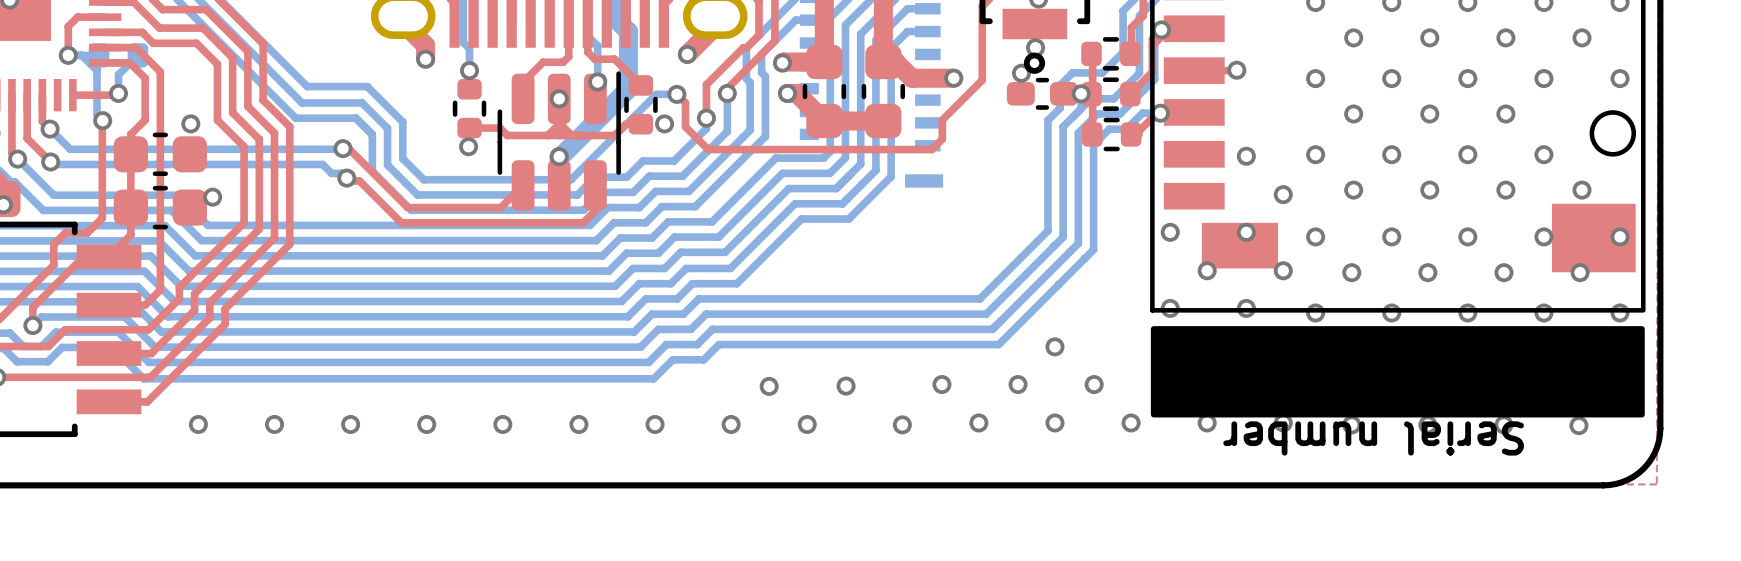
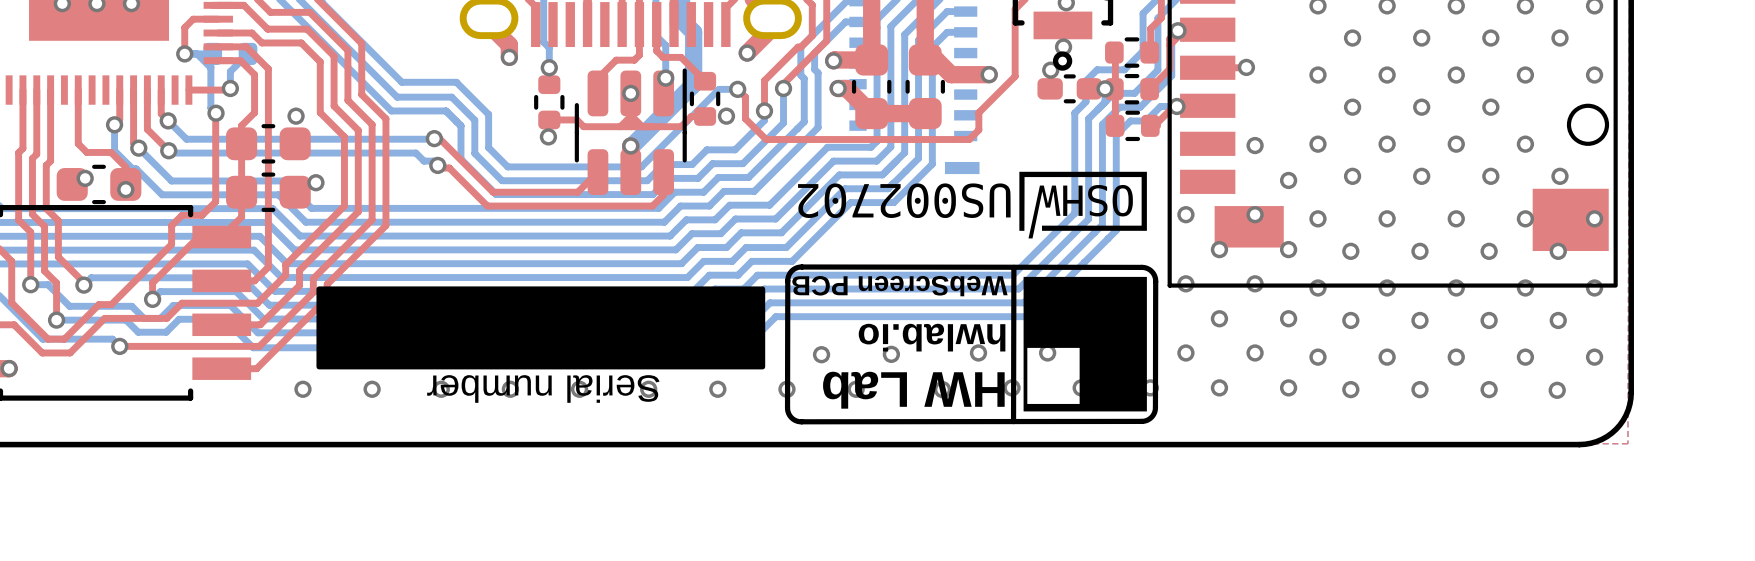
drawing: none -> [798, 171, 1147, 412]
line: none -> (802, 267) (1146, 268) (1152, 272) (1155, 280) (1154, 413) (1149, 419) (1141, 421) (795, 420) (789, 415) (787, 409) (787, 280) (791, 270) (802, 267)
line: none -> (1013, 267) (1013, 421)
text: none -> WebScreen PCB (899, 286)
text: none -> hwlab.io (932, 337)
drawing position: (1397, 371) -> (540, 327)
text: none -> HW Lab (913, 390)
text position: Serial number (1373, 438) -> Serial number (543, 388)

